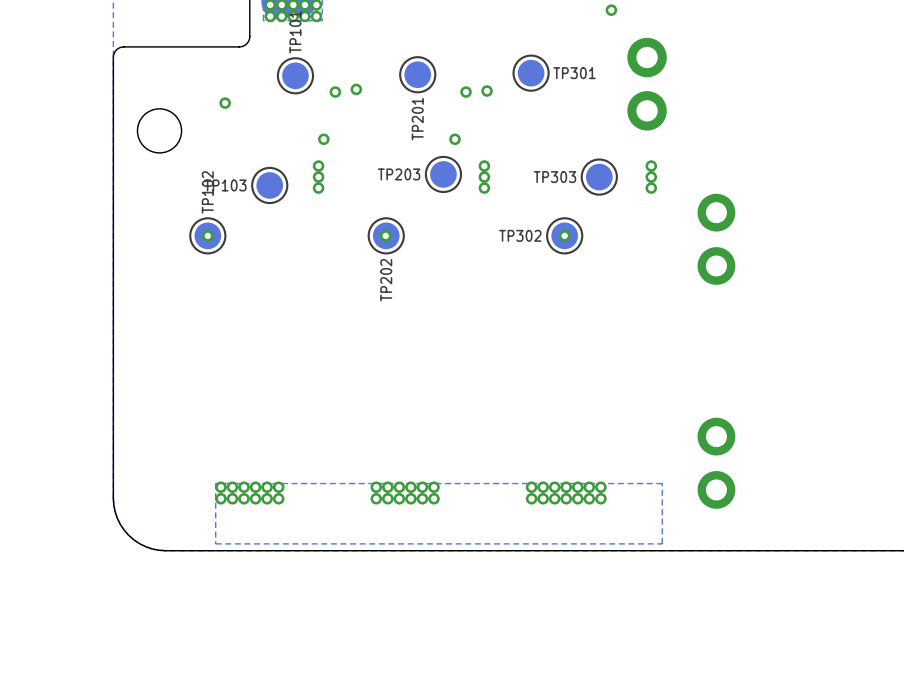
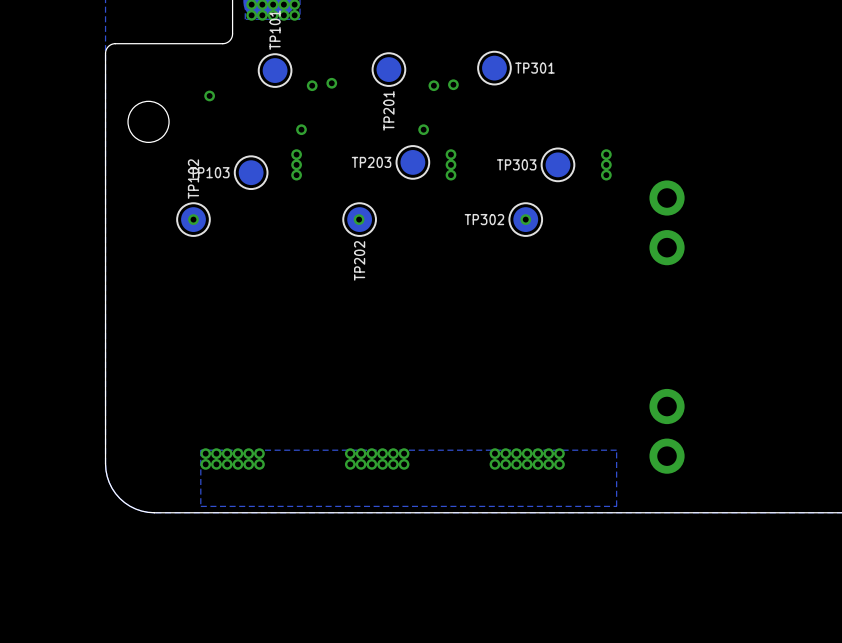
via: (611, 10) -> none
part: (647, 84) -> none

